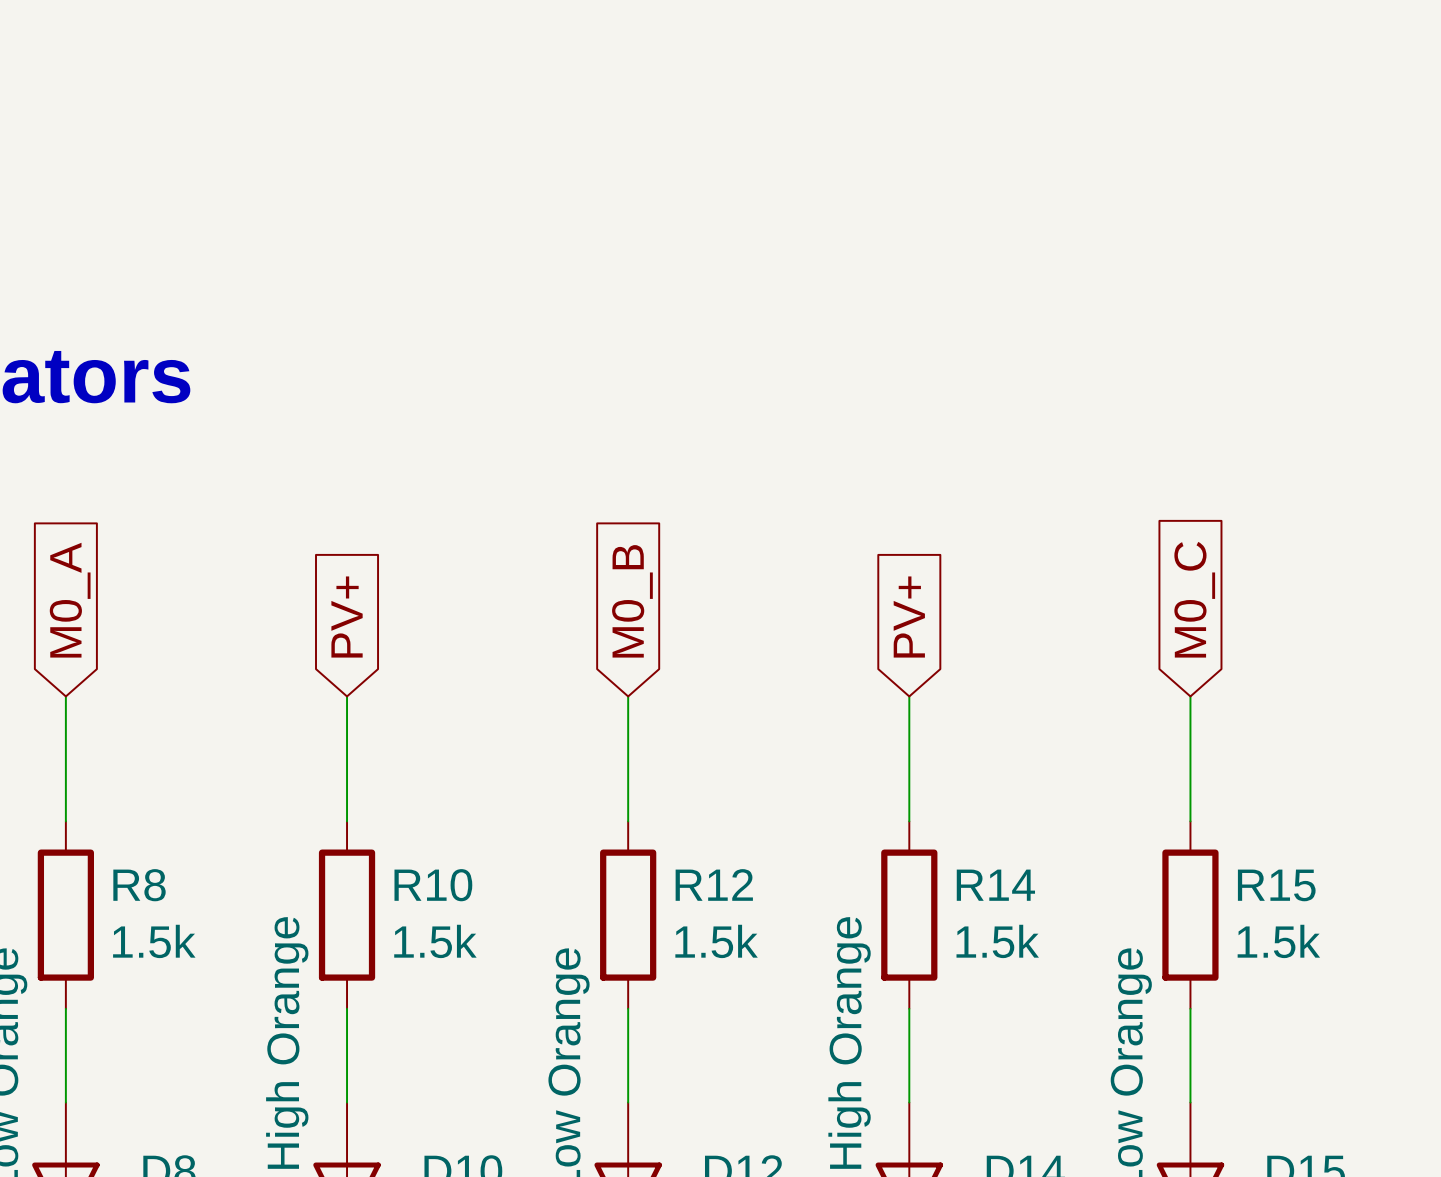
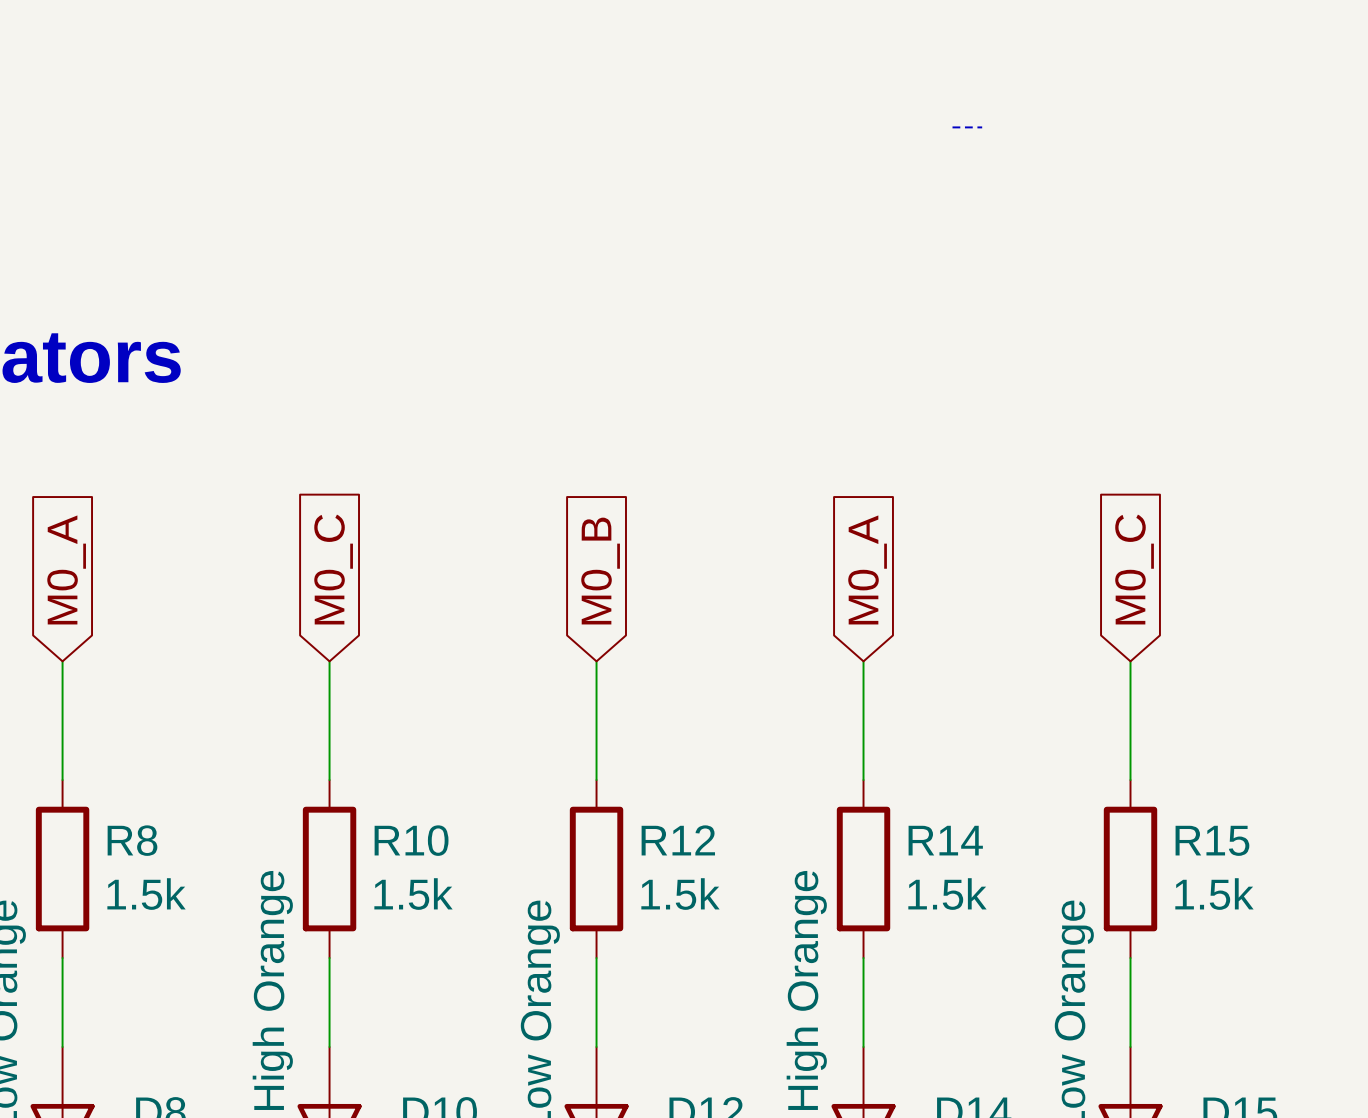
line: none -> (952, 127) (982, 127)
global label: PV+ (347, 617) -> M0_C (333, 569)
global label: PV+ (909, 617) -> M0_A (867, 569)

